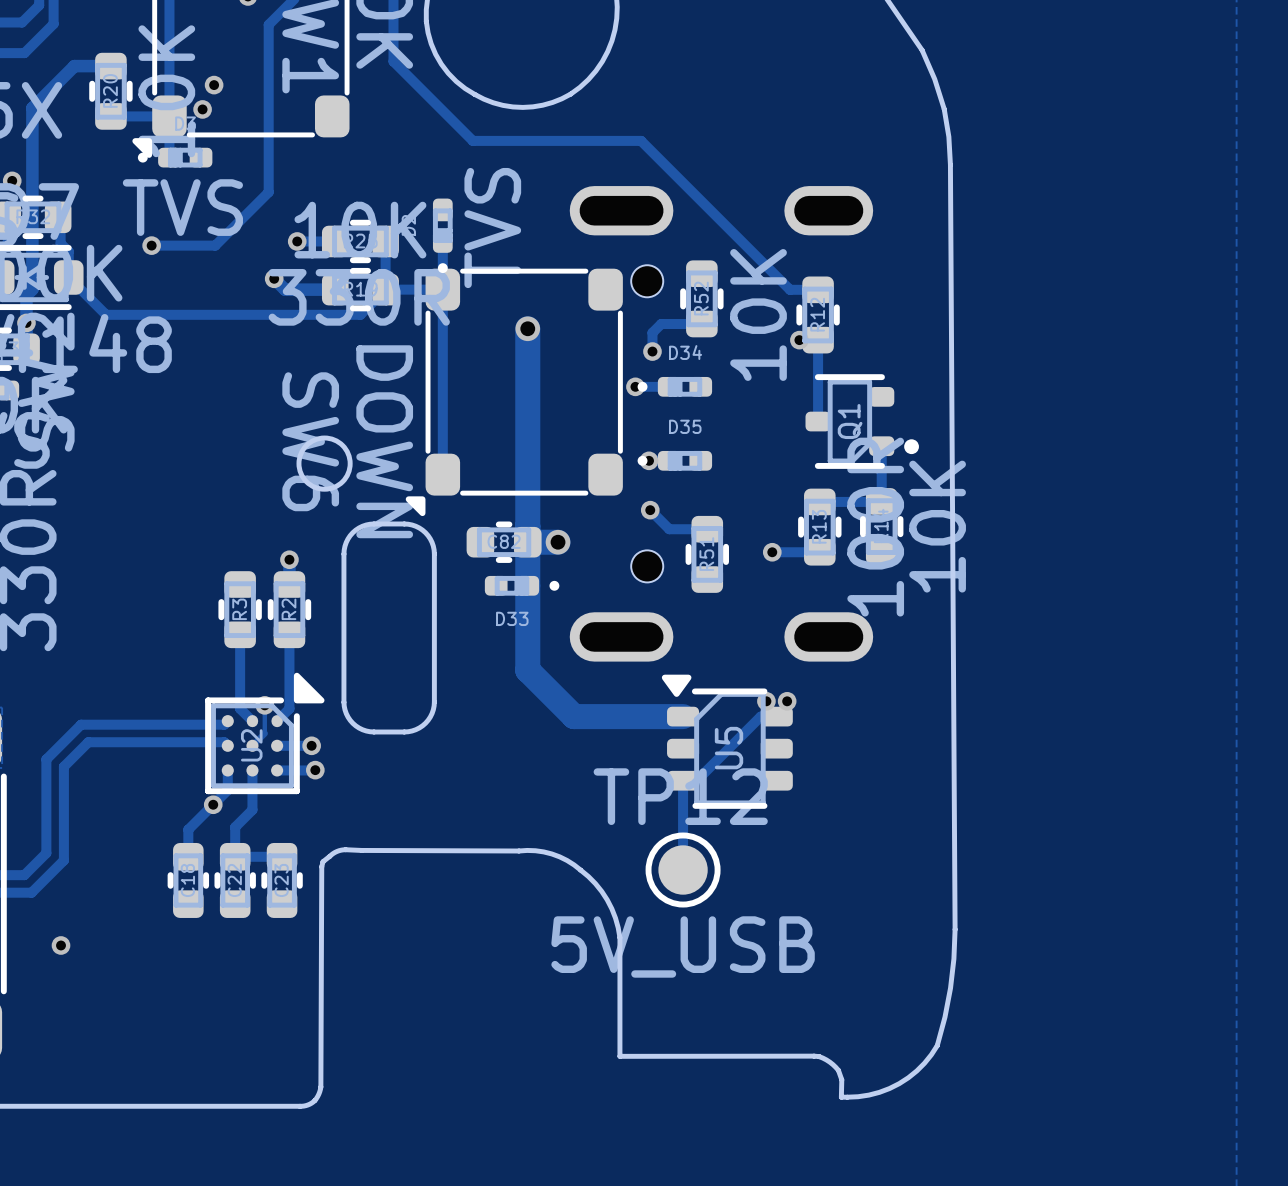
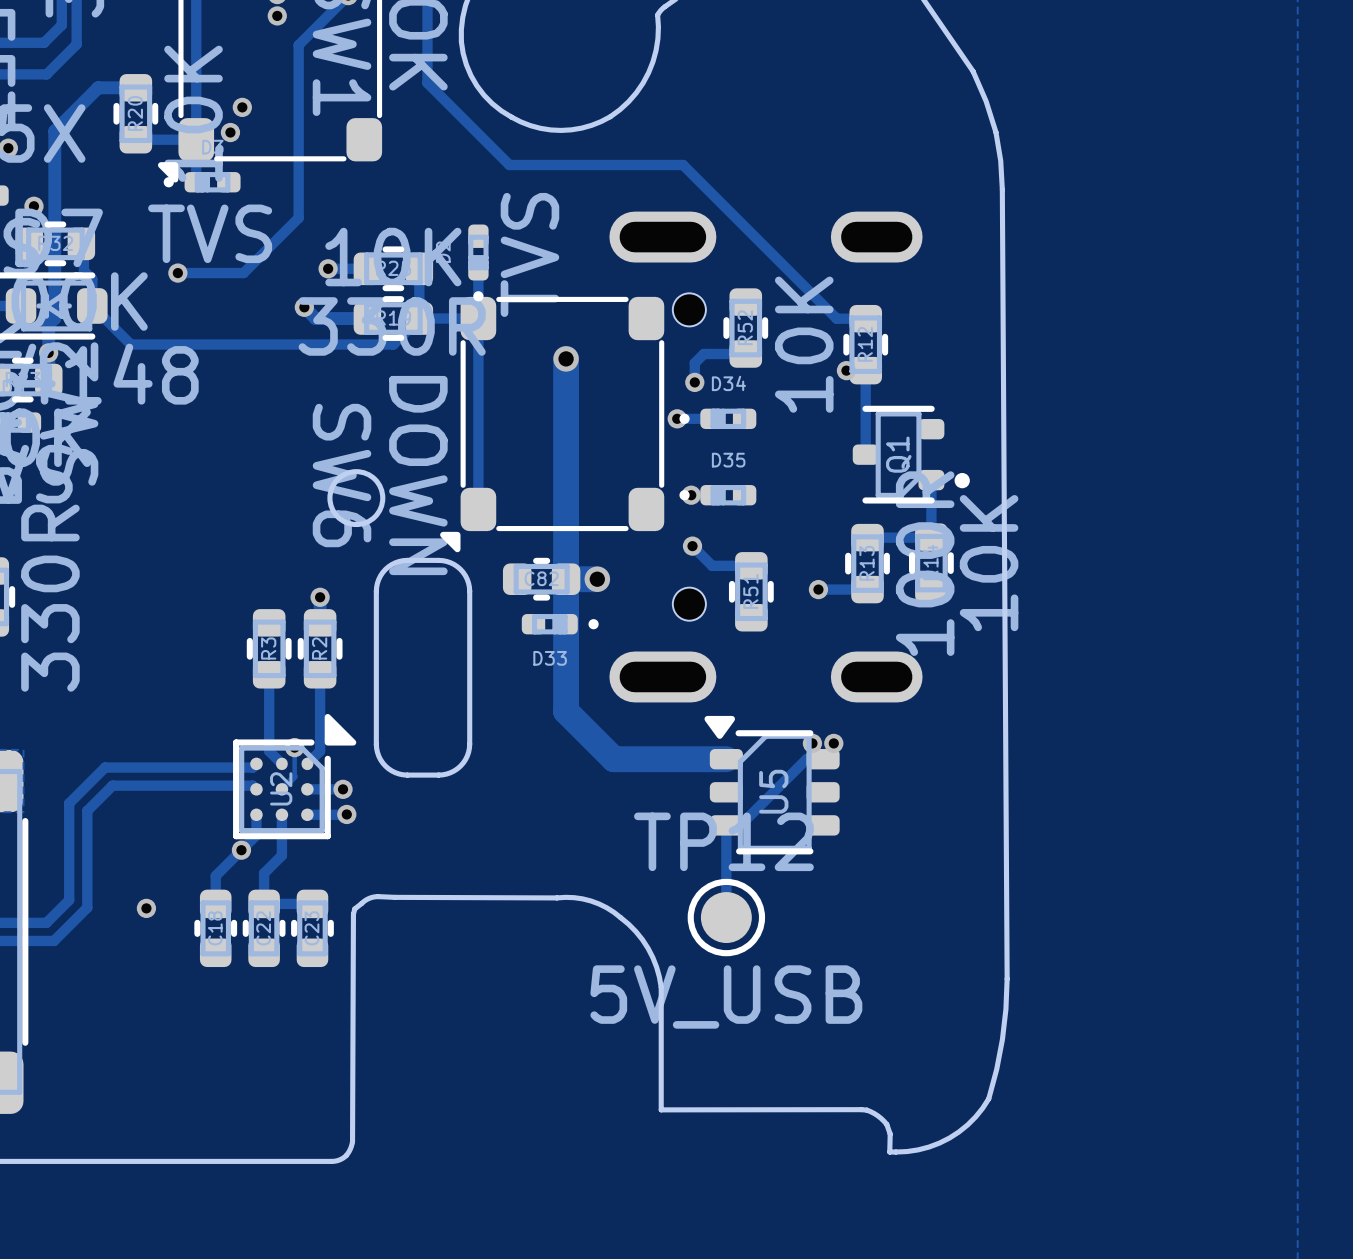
via position: (61, 945) -> (146, 908)

